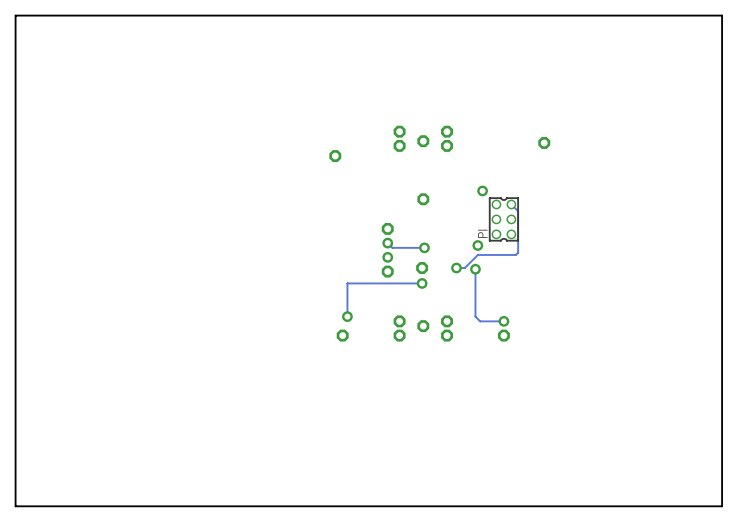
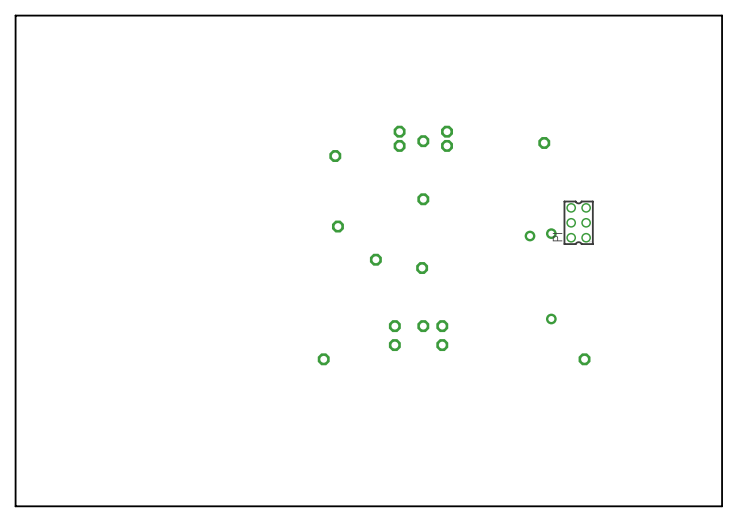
via: (482, 190) -> none
track: (511, 204) (518, 211) (518, 252) (515, 254) (477, 254) (464, 268) (456, 268) -> none
PI position: (503, 219) -> (578, 222)
part: none -> (337, 226)
part: (387, 228) -> none
via: none -> (551, 233)
via: none -> (530, 236)
track: (387, 243) (392, 247) (424, 247) -> none
via: (387, 243) -> none
via: (477, 245) -> none
via: (424, 247) -> none
via: (387, 257) -> none
part: none -> (375, 259)
via: (456, 268) -> none
track: (475, 269) (475, 316) (480, 321) (503, 321) -> none
via: (475, 269) -> none
part: (387, 271) -> none
track: (422, 283) (347, 283) (347, 316) -> none
via: (422, 283) -> none
via: (347, 316) -> none
via: none -> (551, 319)
part: (399, 321) -> none
part: (447, 321) -> none
via: (503, 321) -> none
part: none -> (394, 326)
part: none -> (442, 326)
part: (342, 335) -> none
part: (399, 335) -> none
part: (447, 335) -> none
part: (503, 335) -> none
part: none -> (394, 345)
part: none -> (442, 345)
part: none -> (323, 359)
part: none -> (584, 359)

